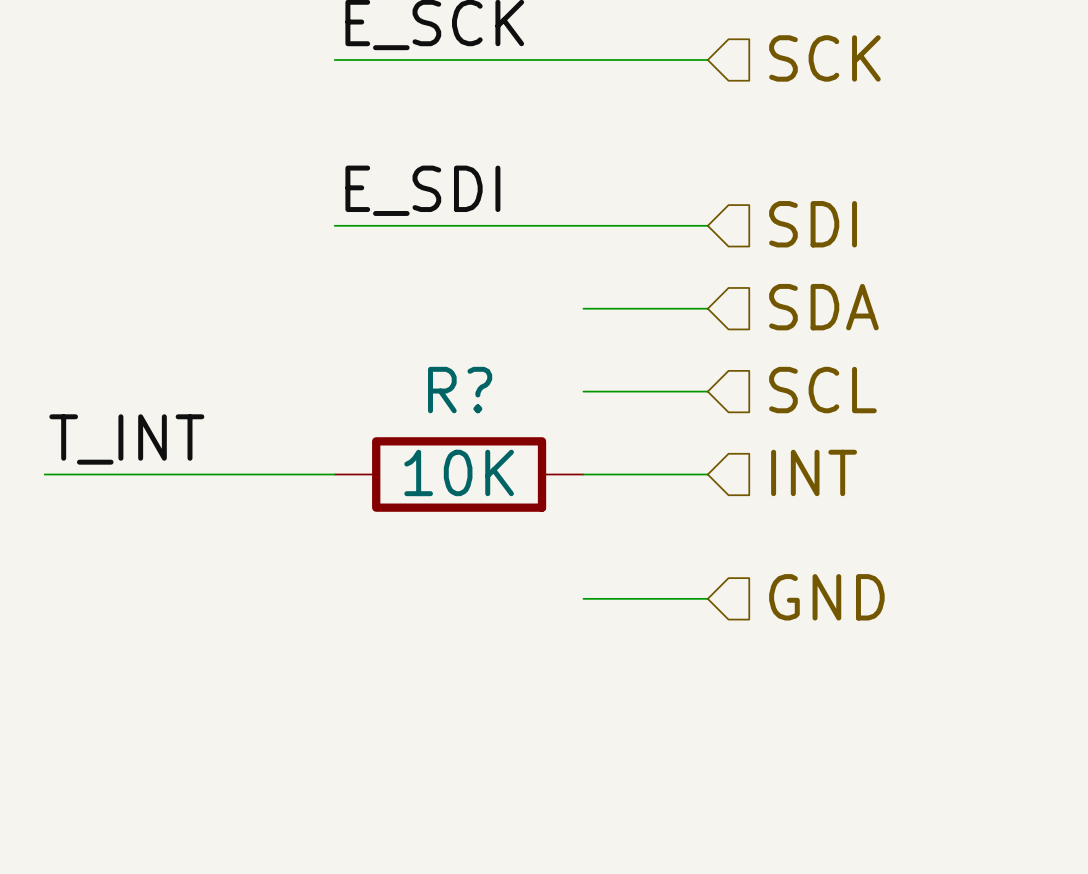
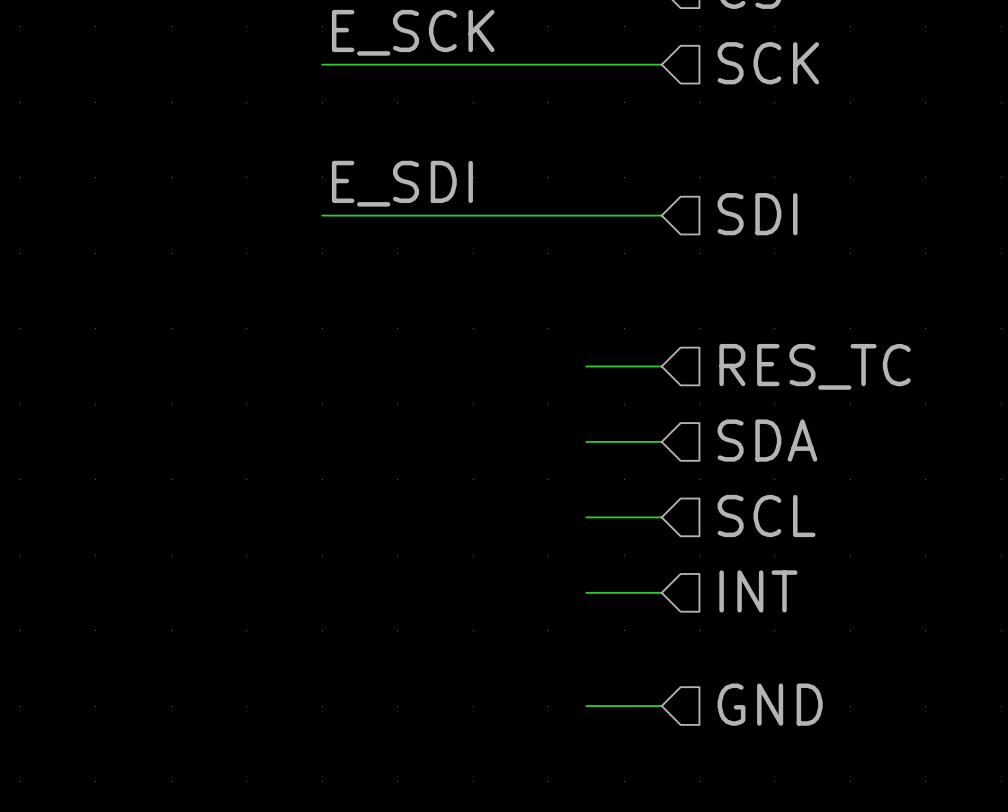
hierarchical label: SDA (823, 307) -> none
wire: (583, 308) (707, 308) -> none
hierarchical label: SCL (822, 390) -> RES_TC (815, 366)
wire: (583, 391) (624, 391) -> none
label: T_INT (126, 439) -> none
hierarchical label: INT (814, 472) -> SDA (767, 440)
wire: (44, 474) (334, 474) -> none
R?: 10K (459, 474) -> none
wire: (583, 474) (624, 474) -> none
hierarchical label: none -> SCL (766, 515)
wire: none -> (586, 517) (661, 517)
hierarchical label position: GND (826, 597) -> GND (770, 704)
wire: (583, 598) (707, 598) -> none
hierarchical label: none -> INT (758, 591)
wire: none -> (586, 592) (661, 592)
wire: none -> (586, 706) (661, 706)

